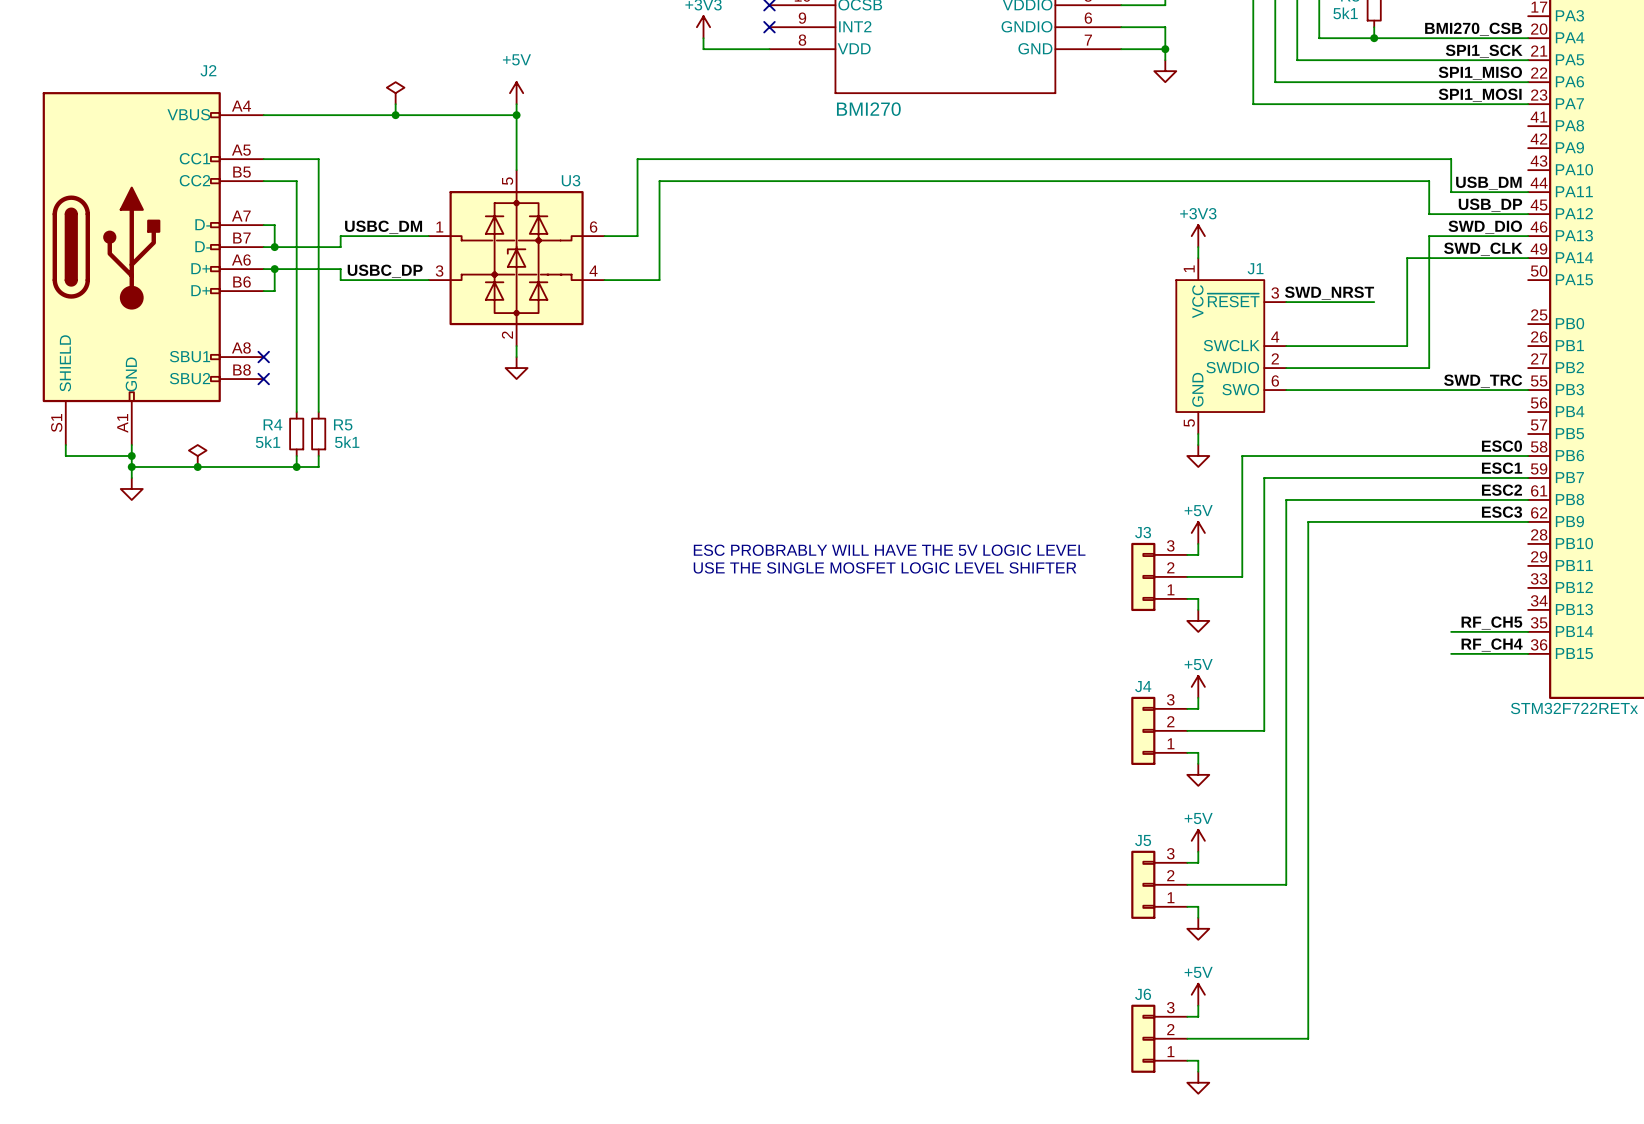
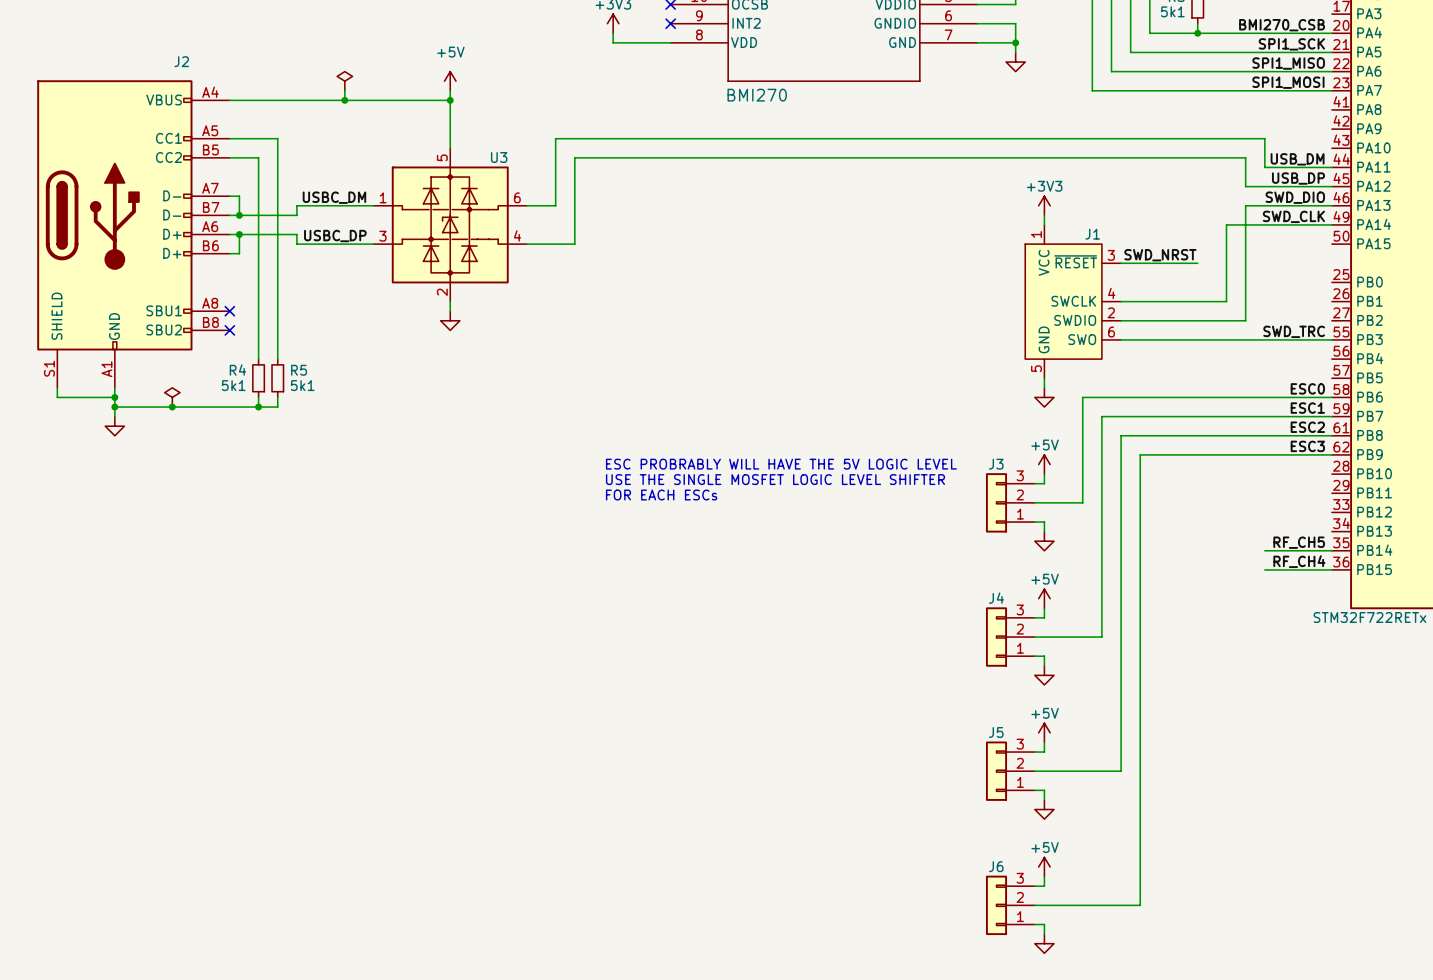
text: none -> ESC PROBRABLY WILL HAVE THE 5V LOGIC LEVEL (781, 464)
text: ESC PROBRABLY WILL HAVE THE 5V LOGIC LEVEL (889, 550) -> USE THE SINGLE MOSFET LOGIC LEVEL SHIFTER (775, 479)
text: USE THE SINGLE MOSFET LOGIC LEVEL SHIFTER (885, 567) -> FOR EACH ESCs (661, 495)

